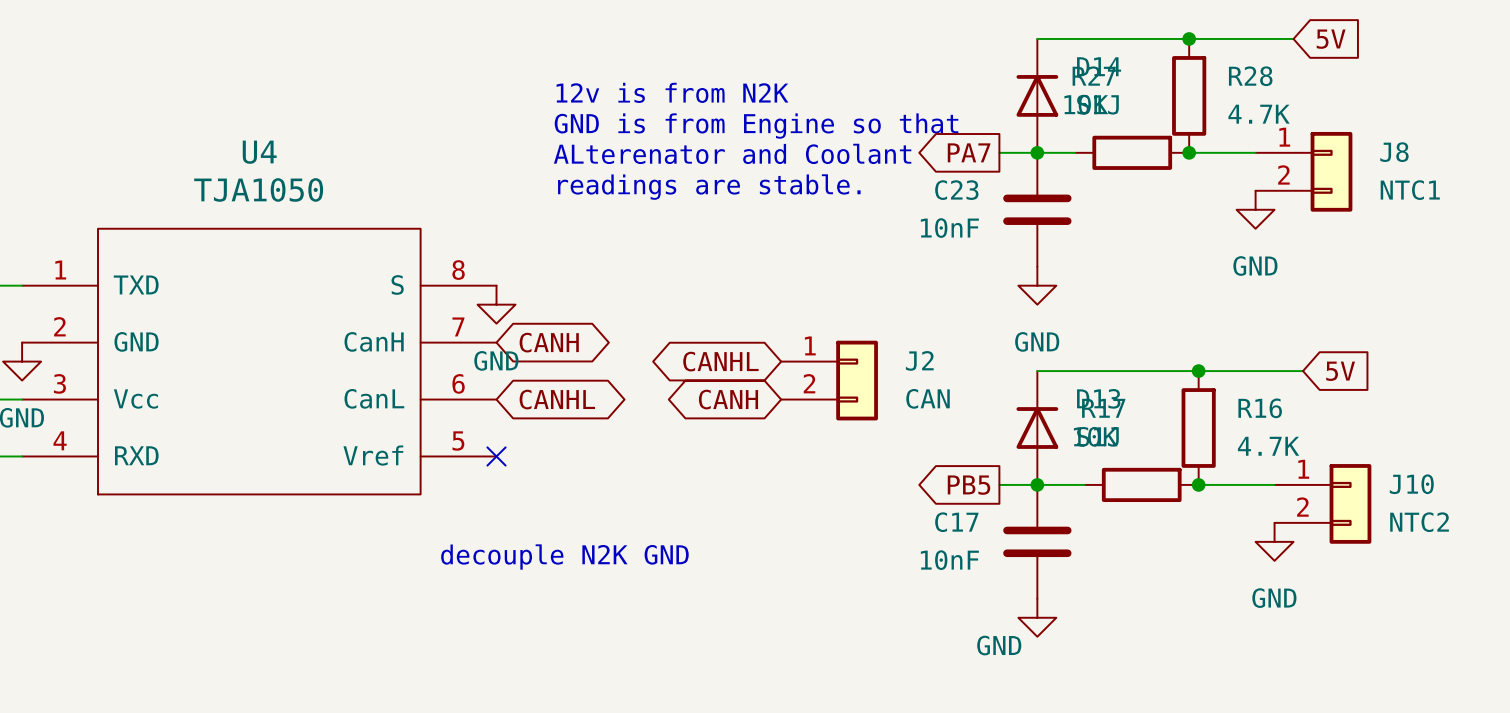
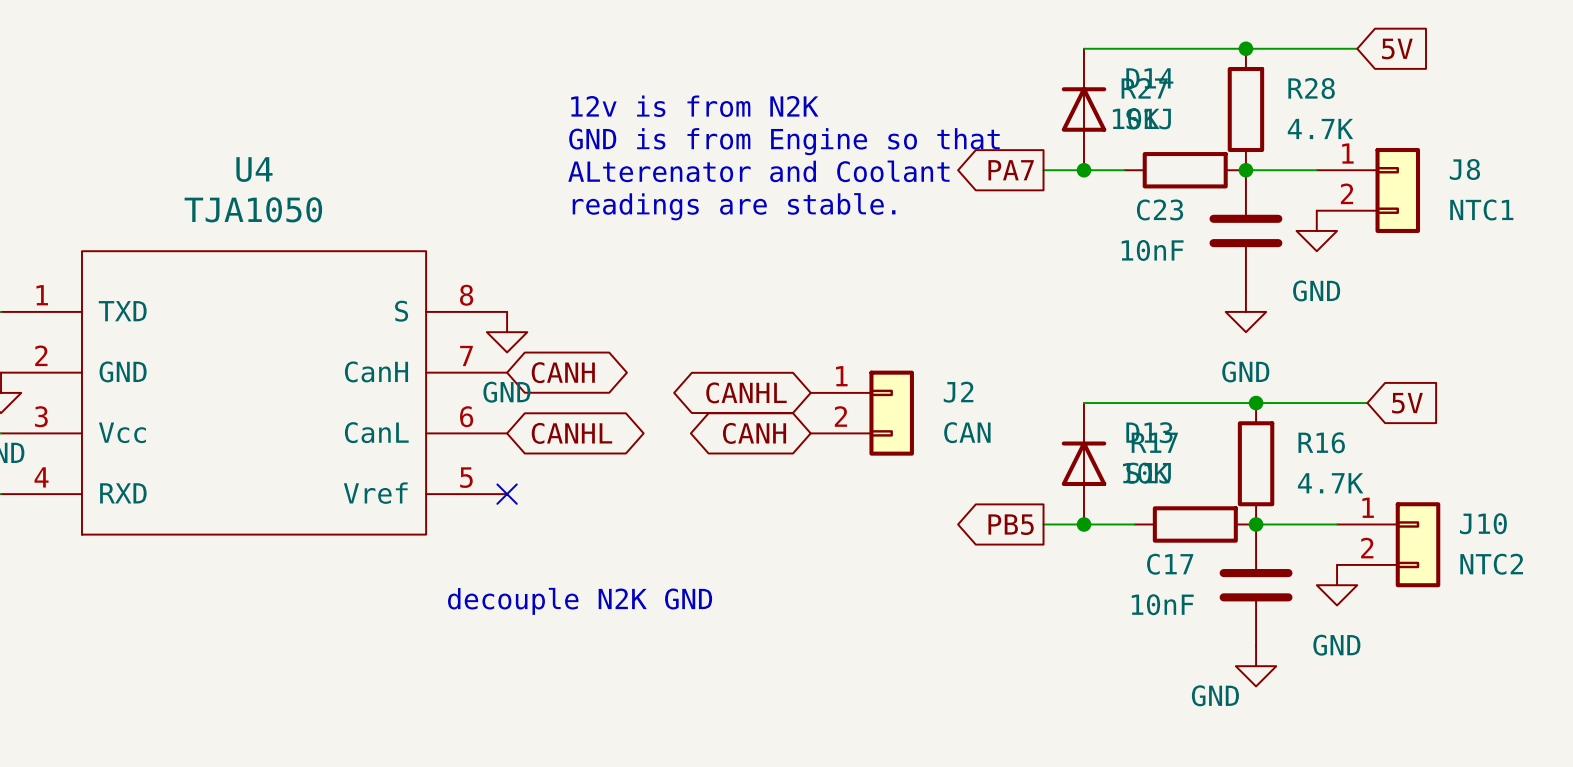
C23 position: (1037, 209) -> (1245, 230)
power symbol position: GND (1037, 285) -> GND (1245, 311)
C17 position: (1037, 541) -> (1256, 585)
power symbol position: GND (1037, 617) -> GND (1256, 666)

